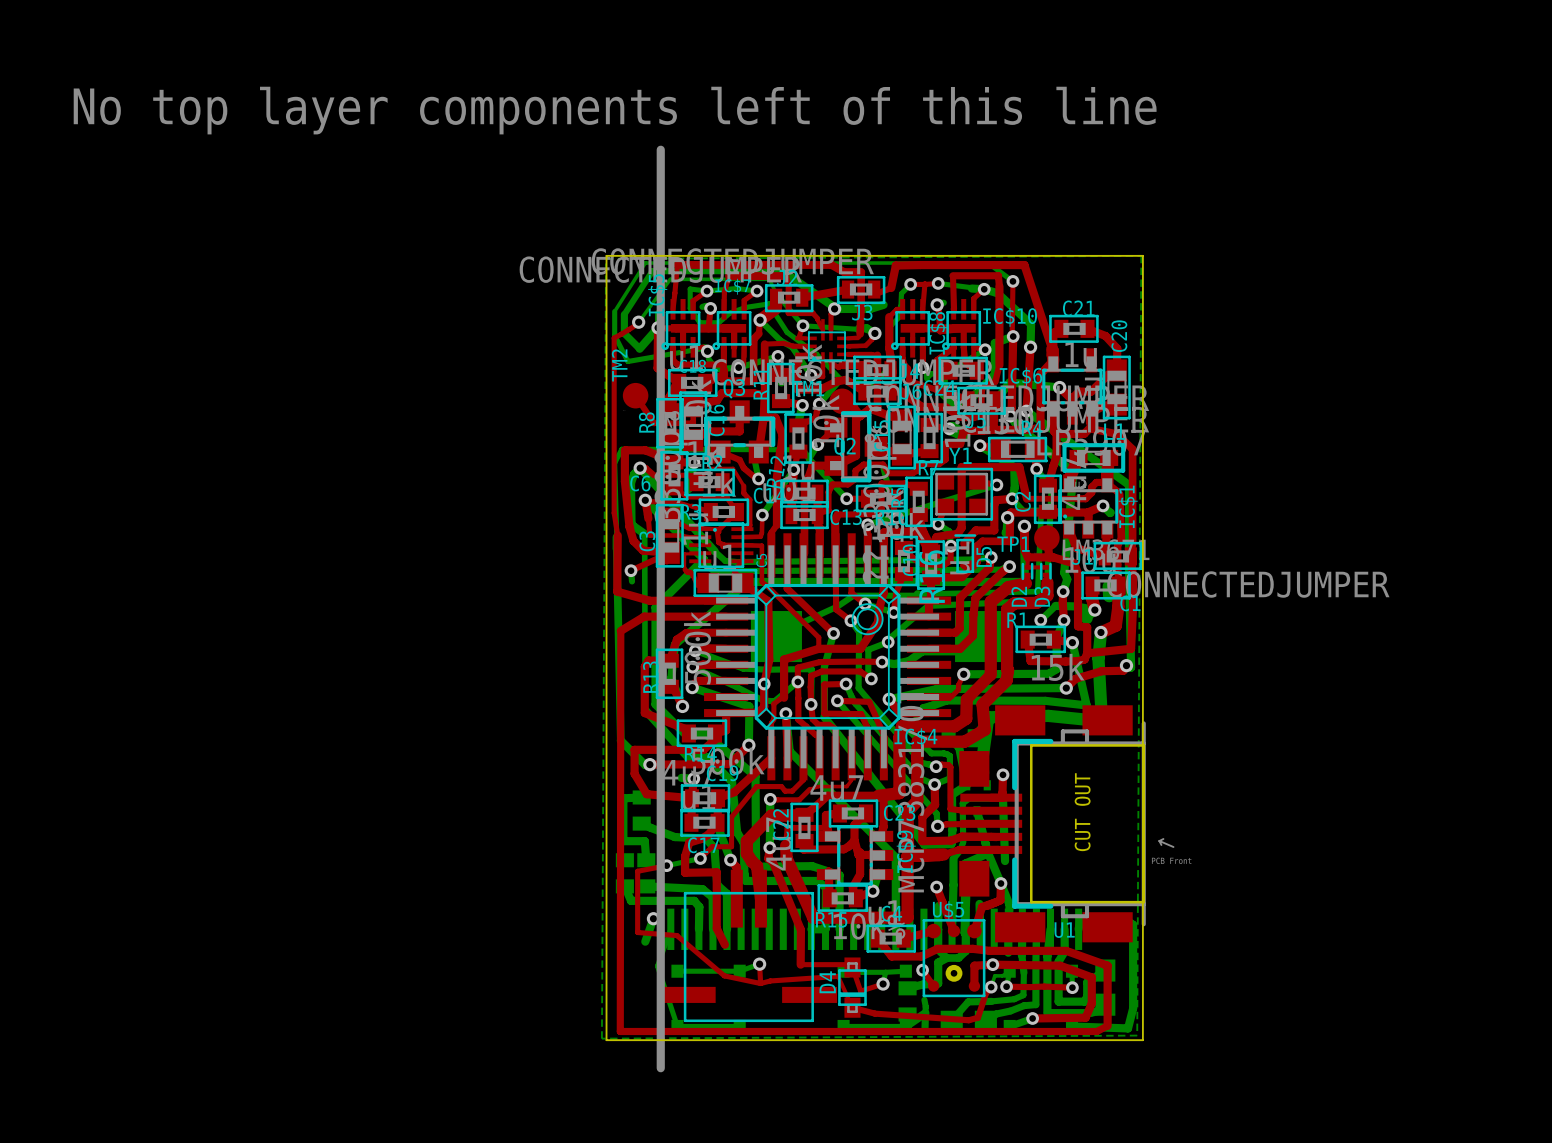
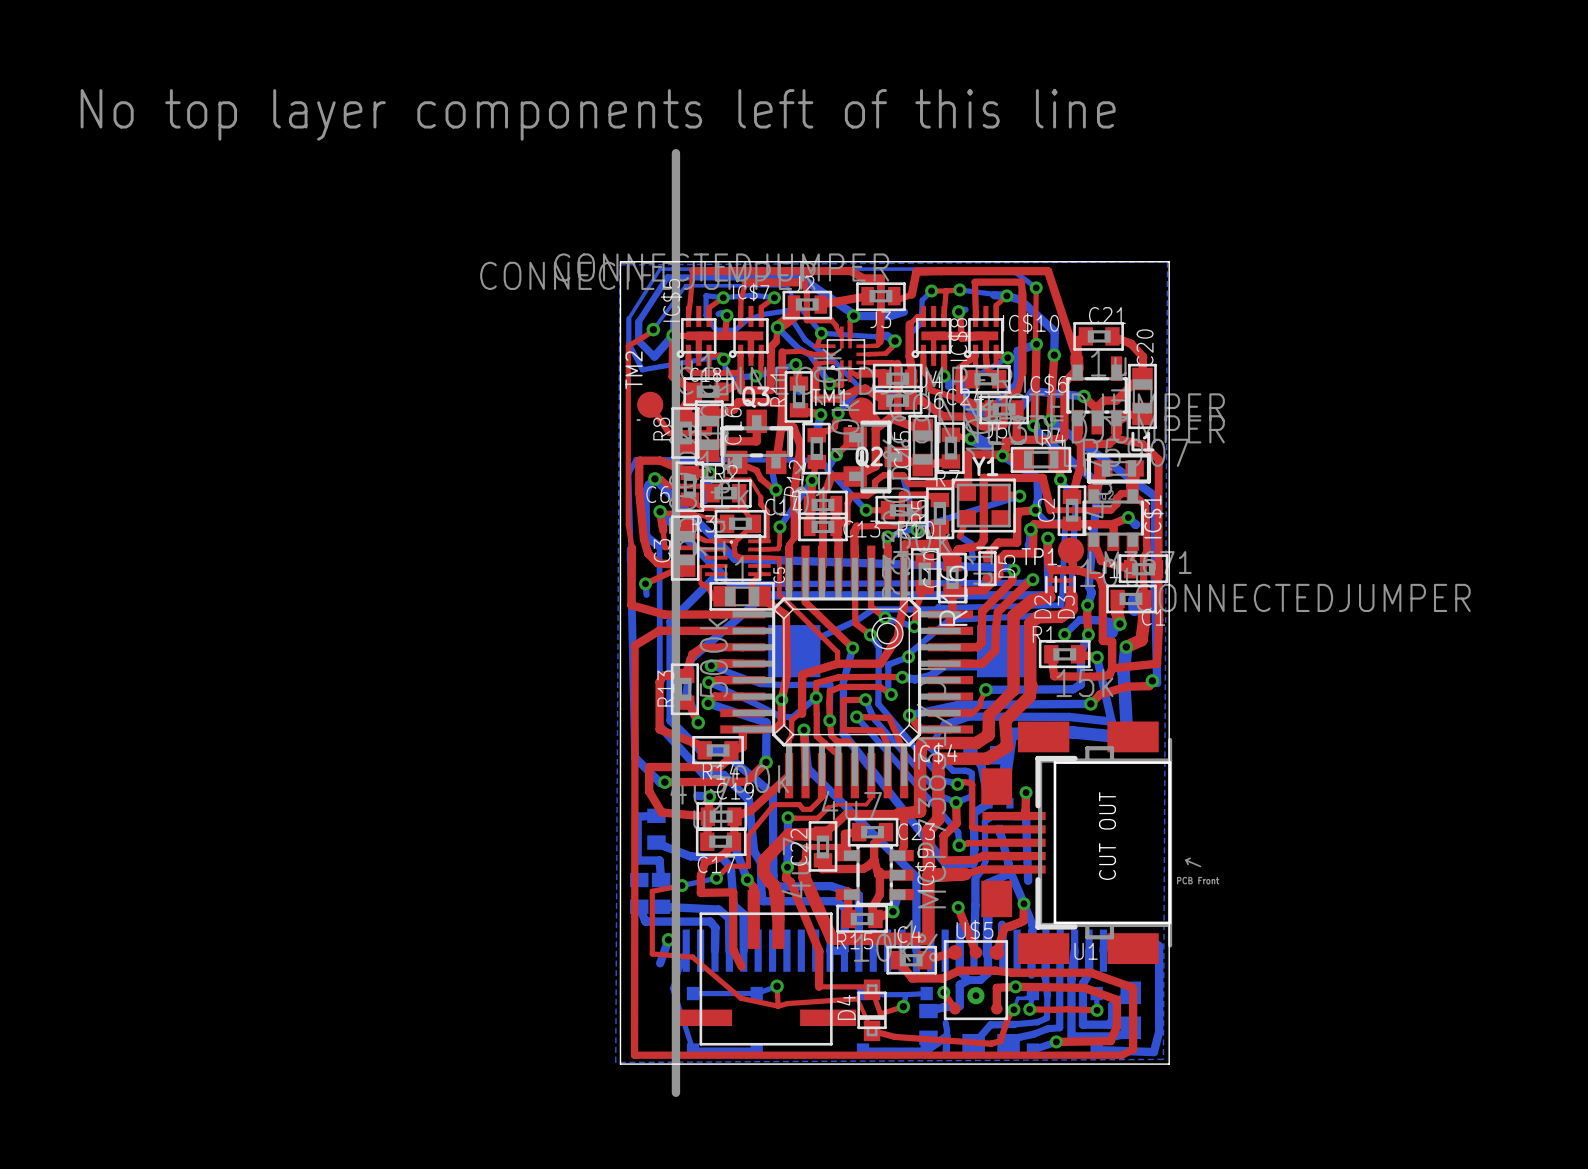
top track: (993, 429) (963, 430) (960, 444) (945, 444) (945, 459) (939, 464) (919, 464) (917, 465) (917, 470) (906, 473) -> (1016, 439) (1005, 441) (1005, 449) (1001, 454) (967, 454) (968, 483) (927, 484)
bottom track: (640, 468) (725, 561) (972, 559) (991, 557) -> (654, 478) (734, 558) (1014, 568)
via: (938, 524) -> none
top track: (950, 546) (950, 561) (943, 565) (921, 564) (912, 557) (904, 547) -> none
via: (950, 546) -> none

